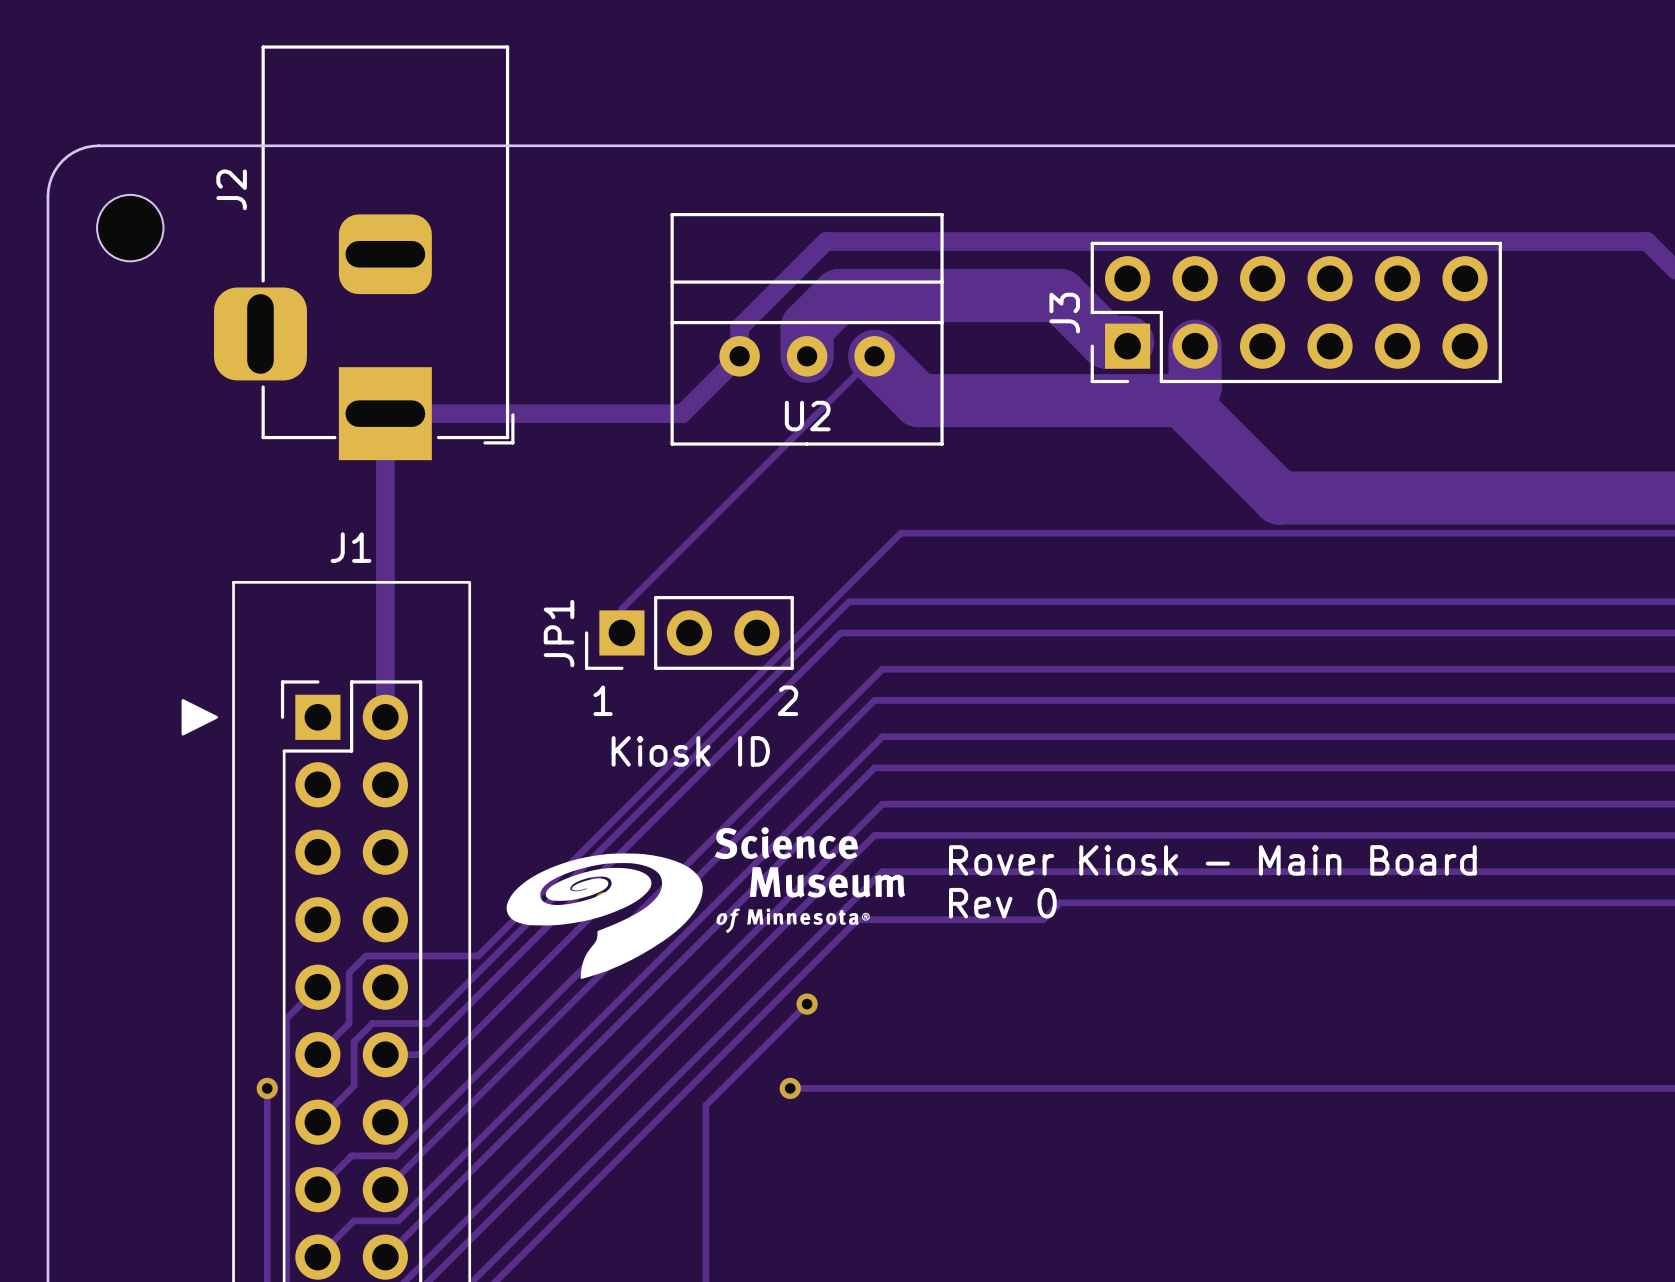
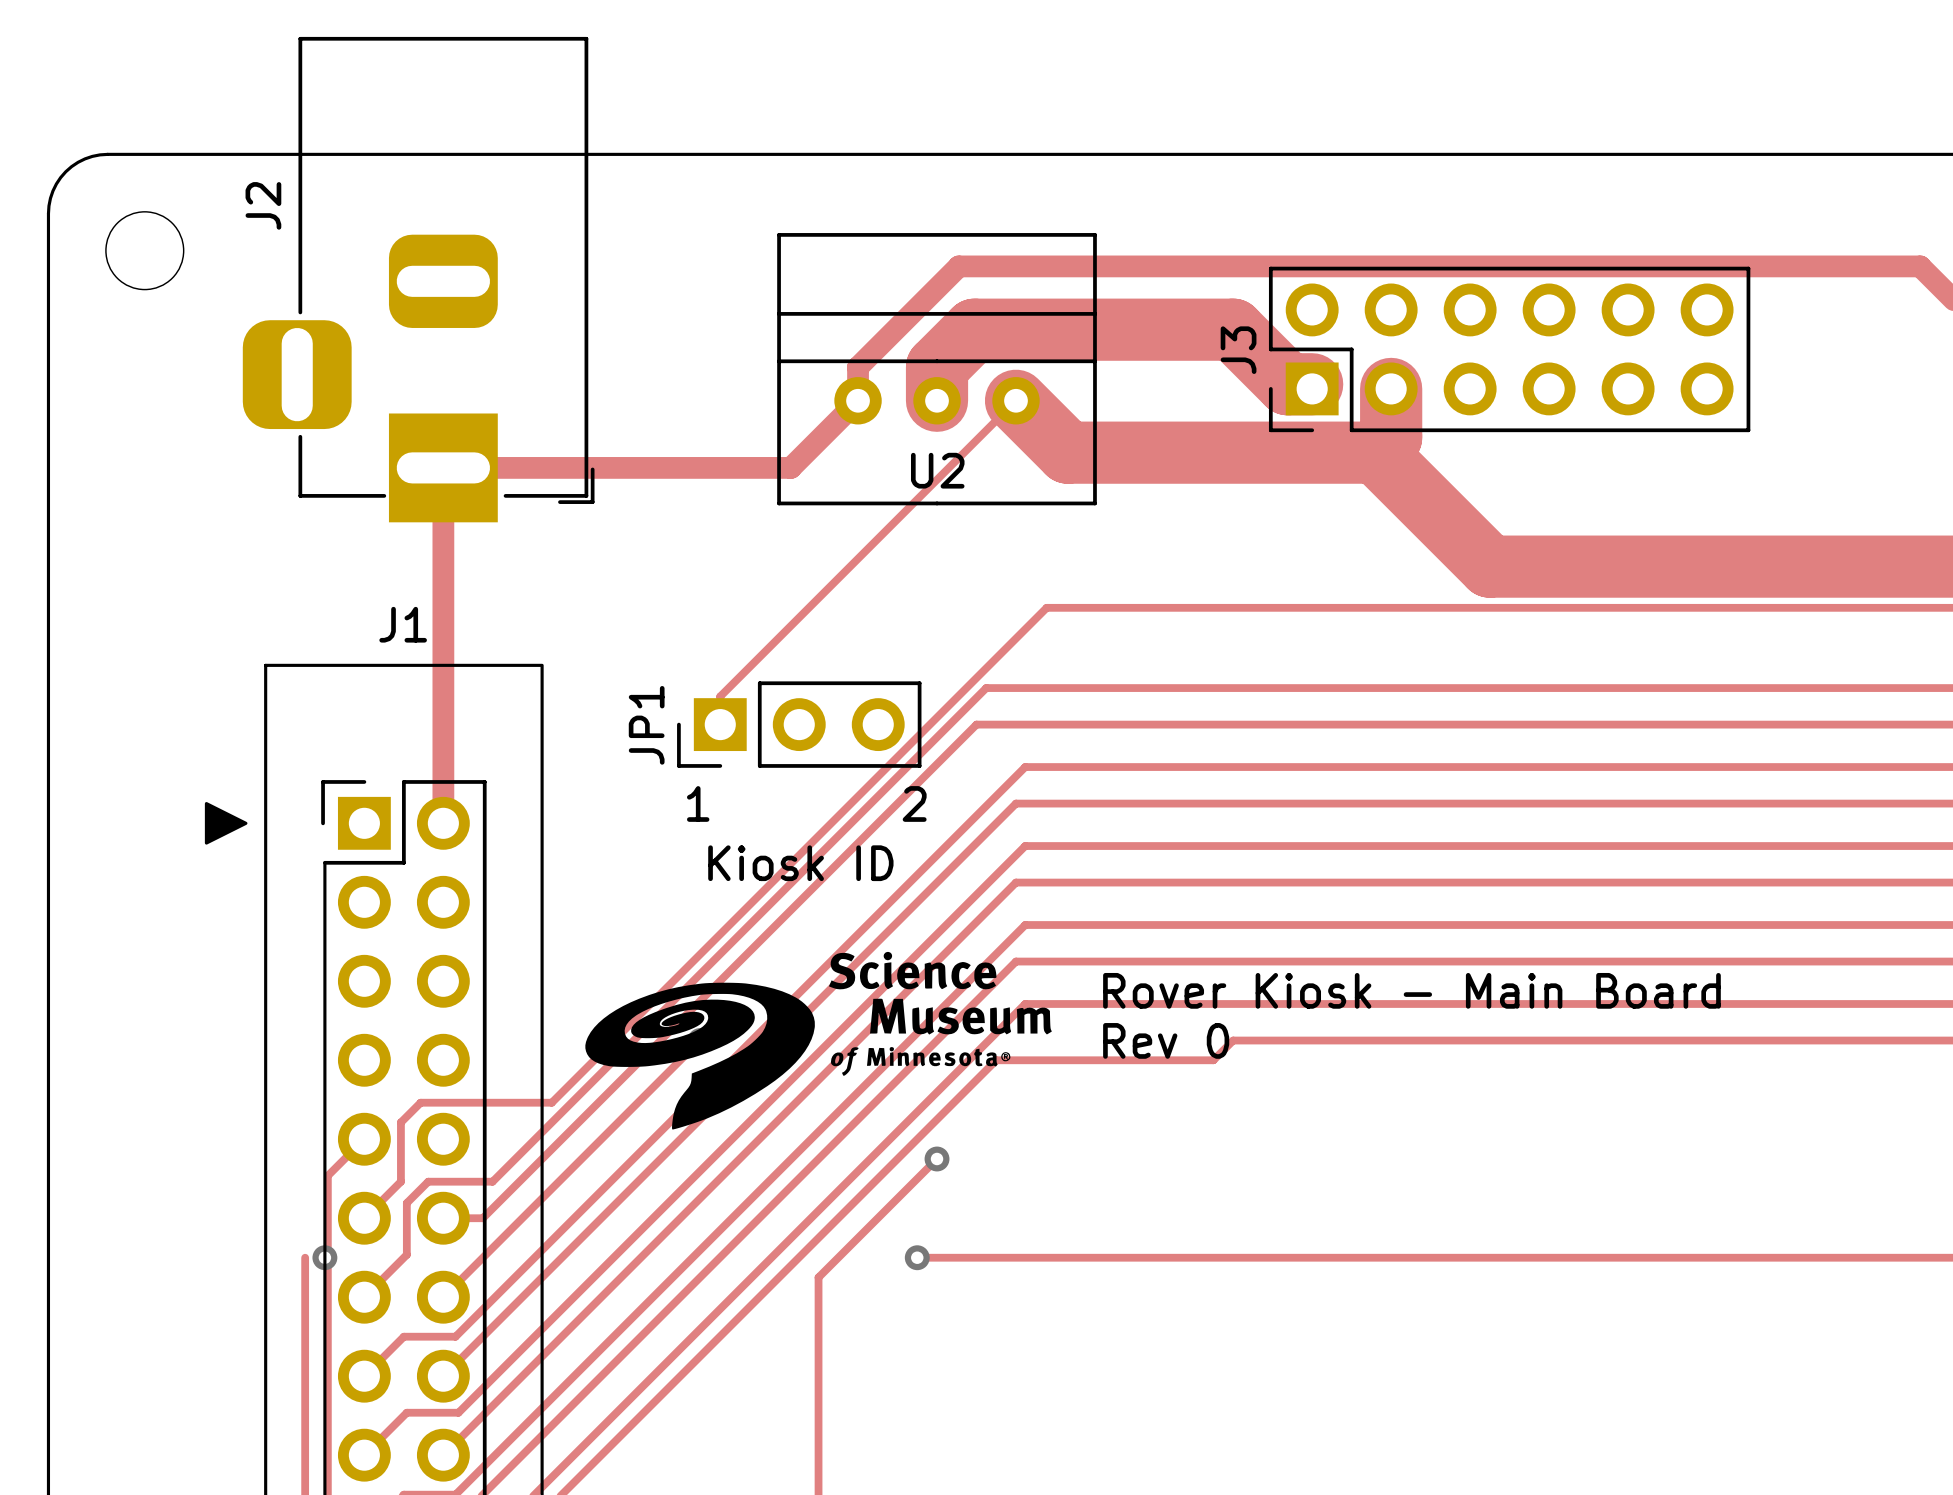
via position: (267, 1088) -> (324, 1257)

